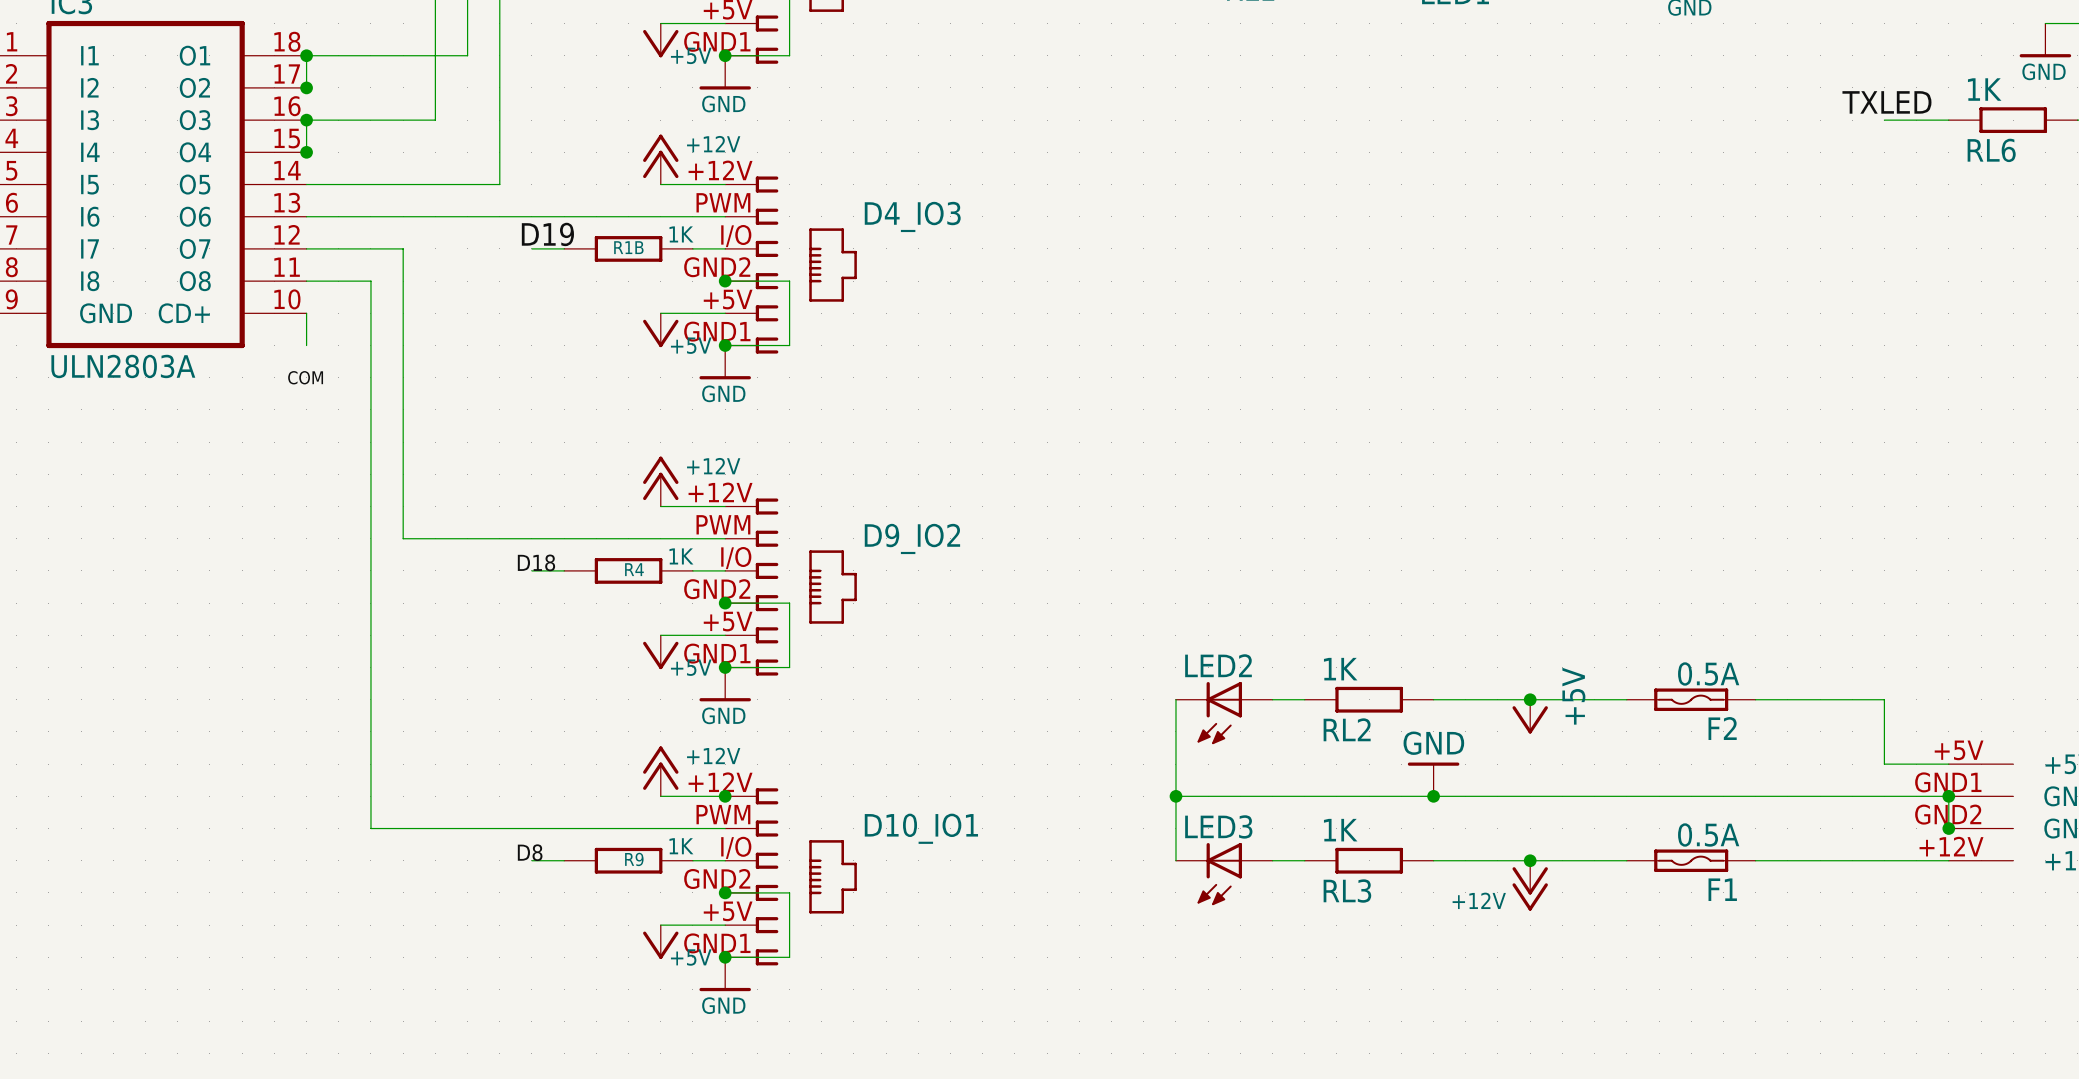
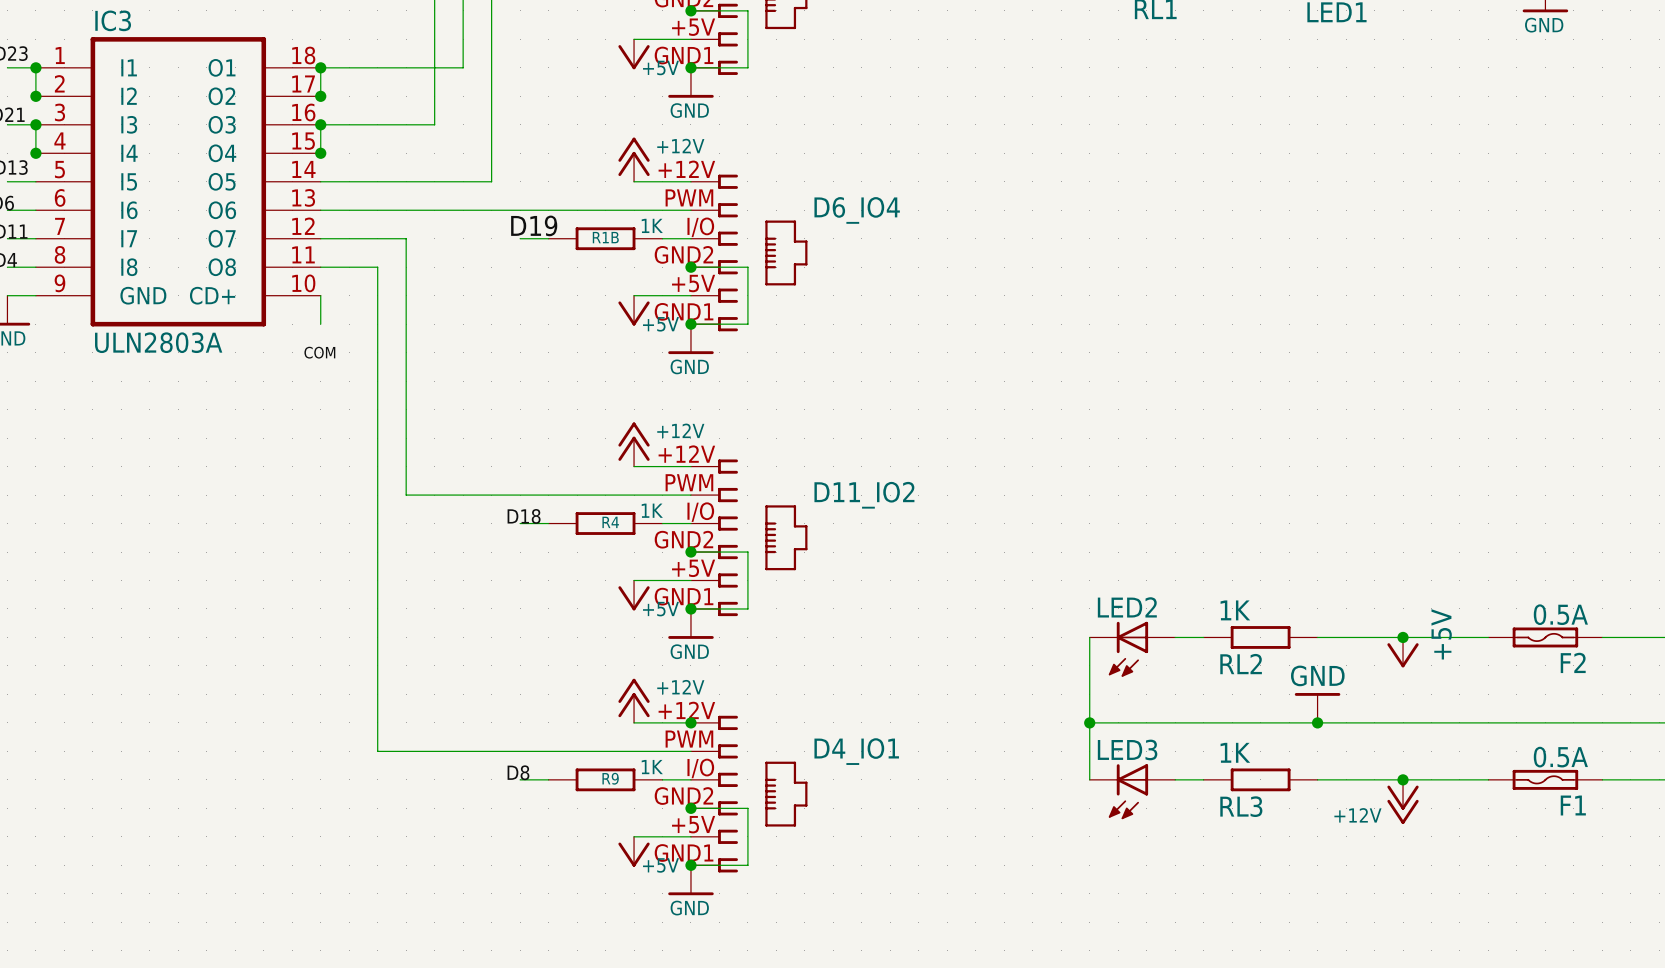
D4_IO3 name: D4_IO3 (912, 216) -> D6_IO4 (857, 210)
D9_IO2 name: D9_IO2 (912, 538) -> D11_IO2 (864, 495)
D10_IO1 name: D10_IO1 (921, 828) -> D4_IO1 (856, 751)

